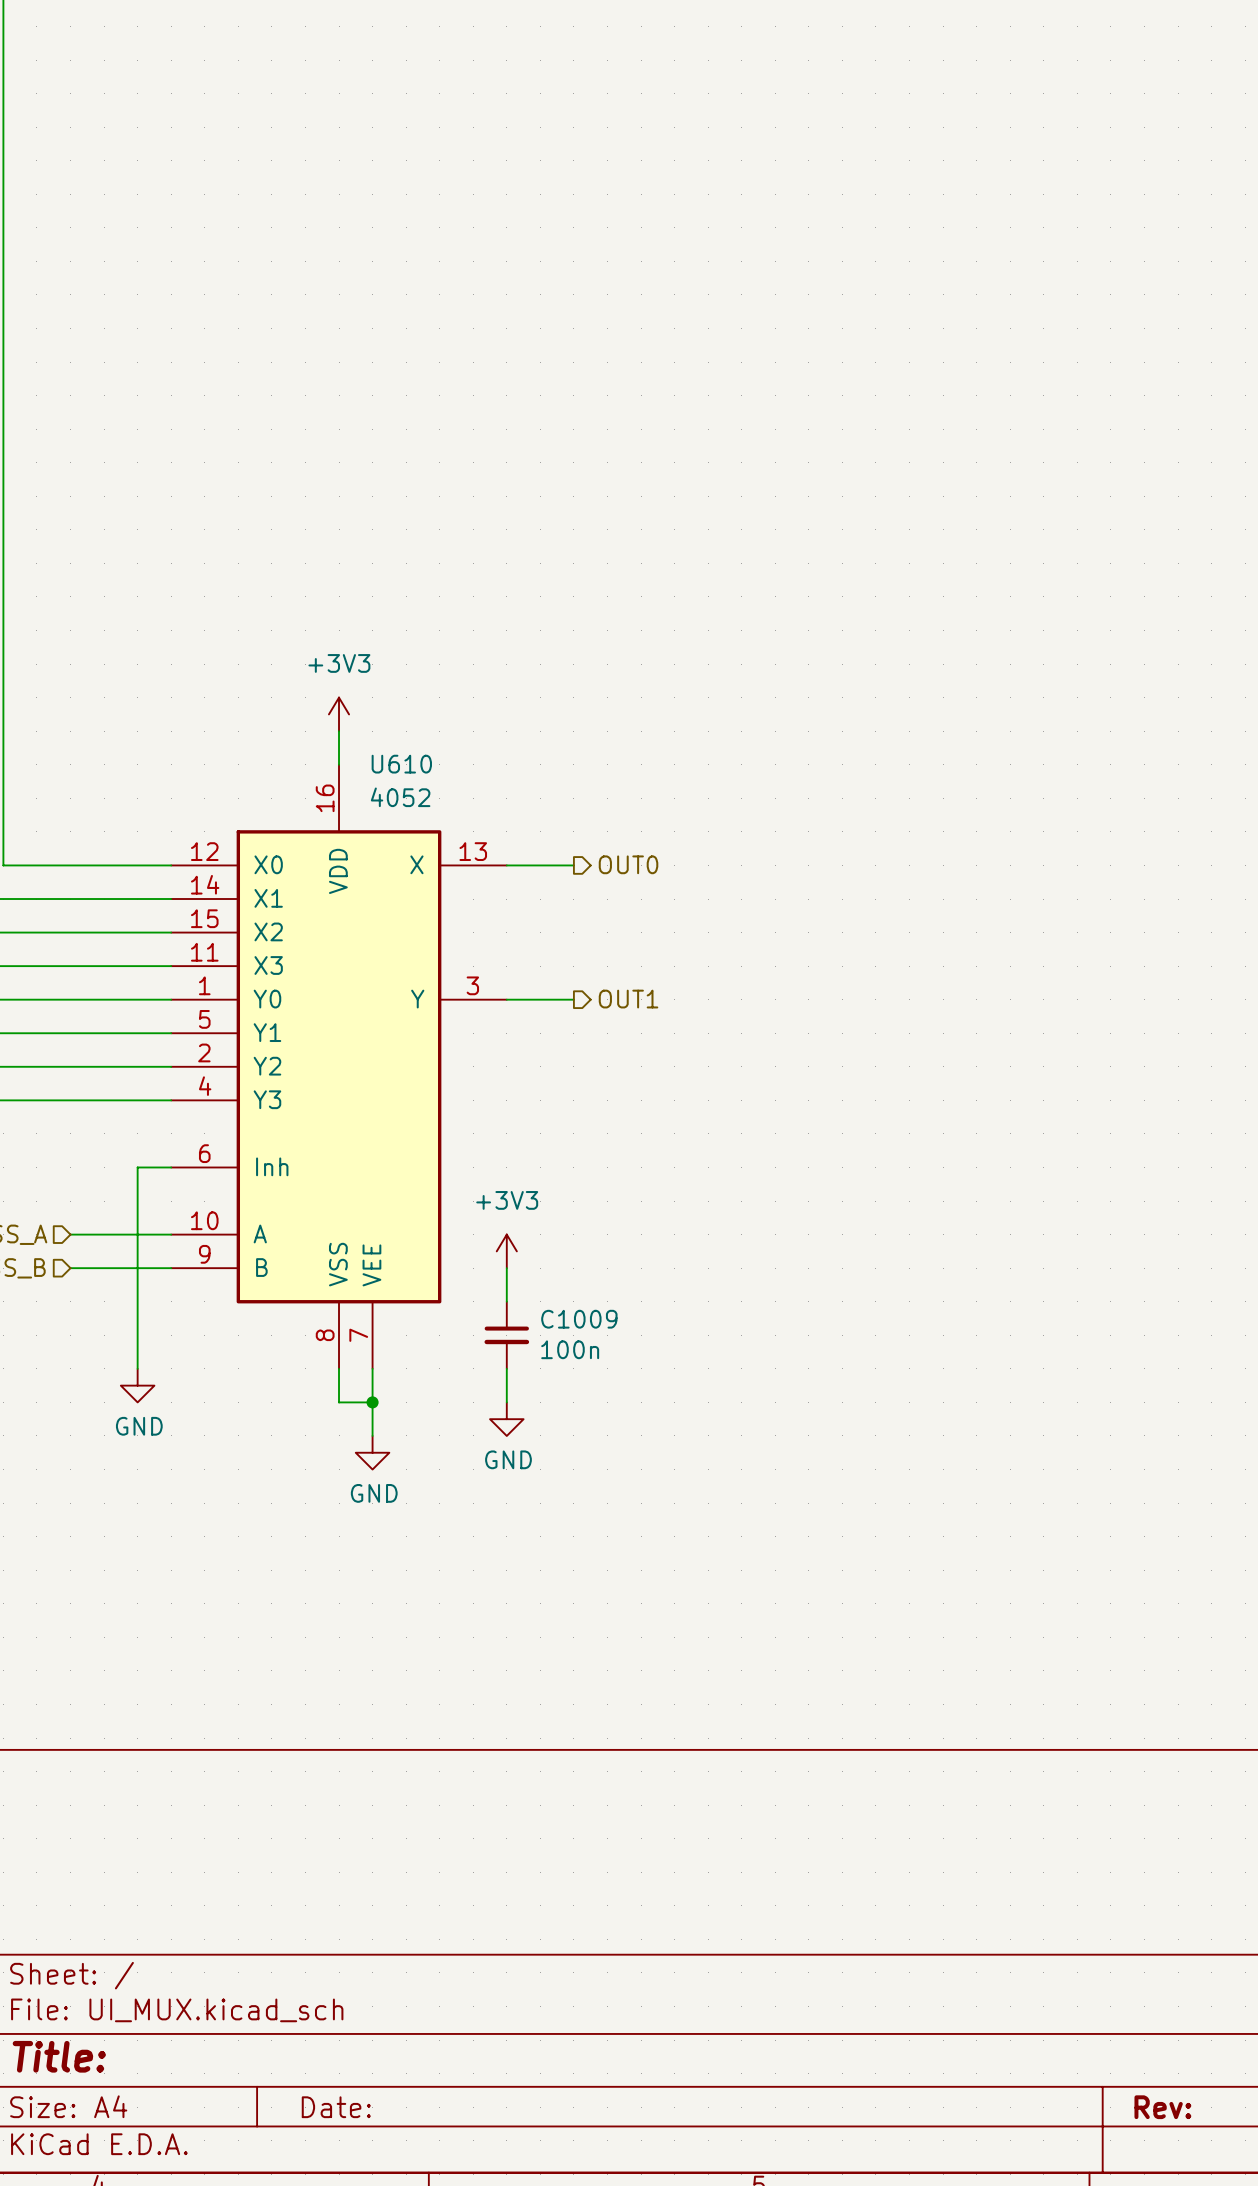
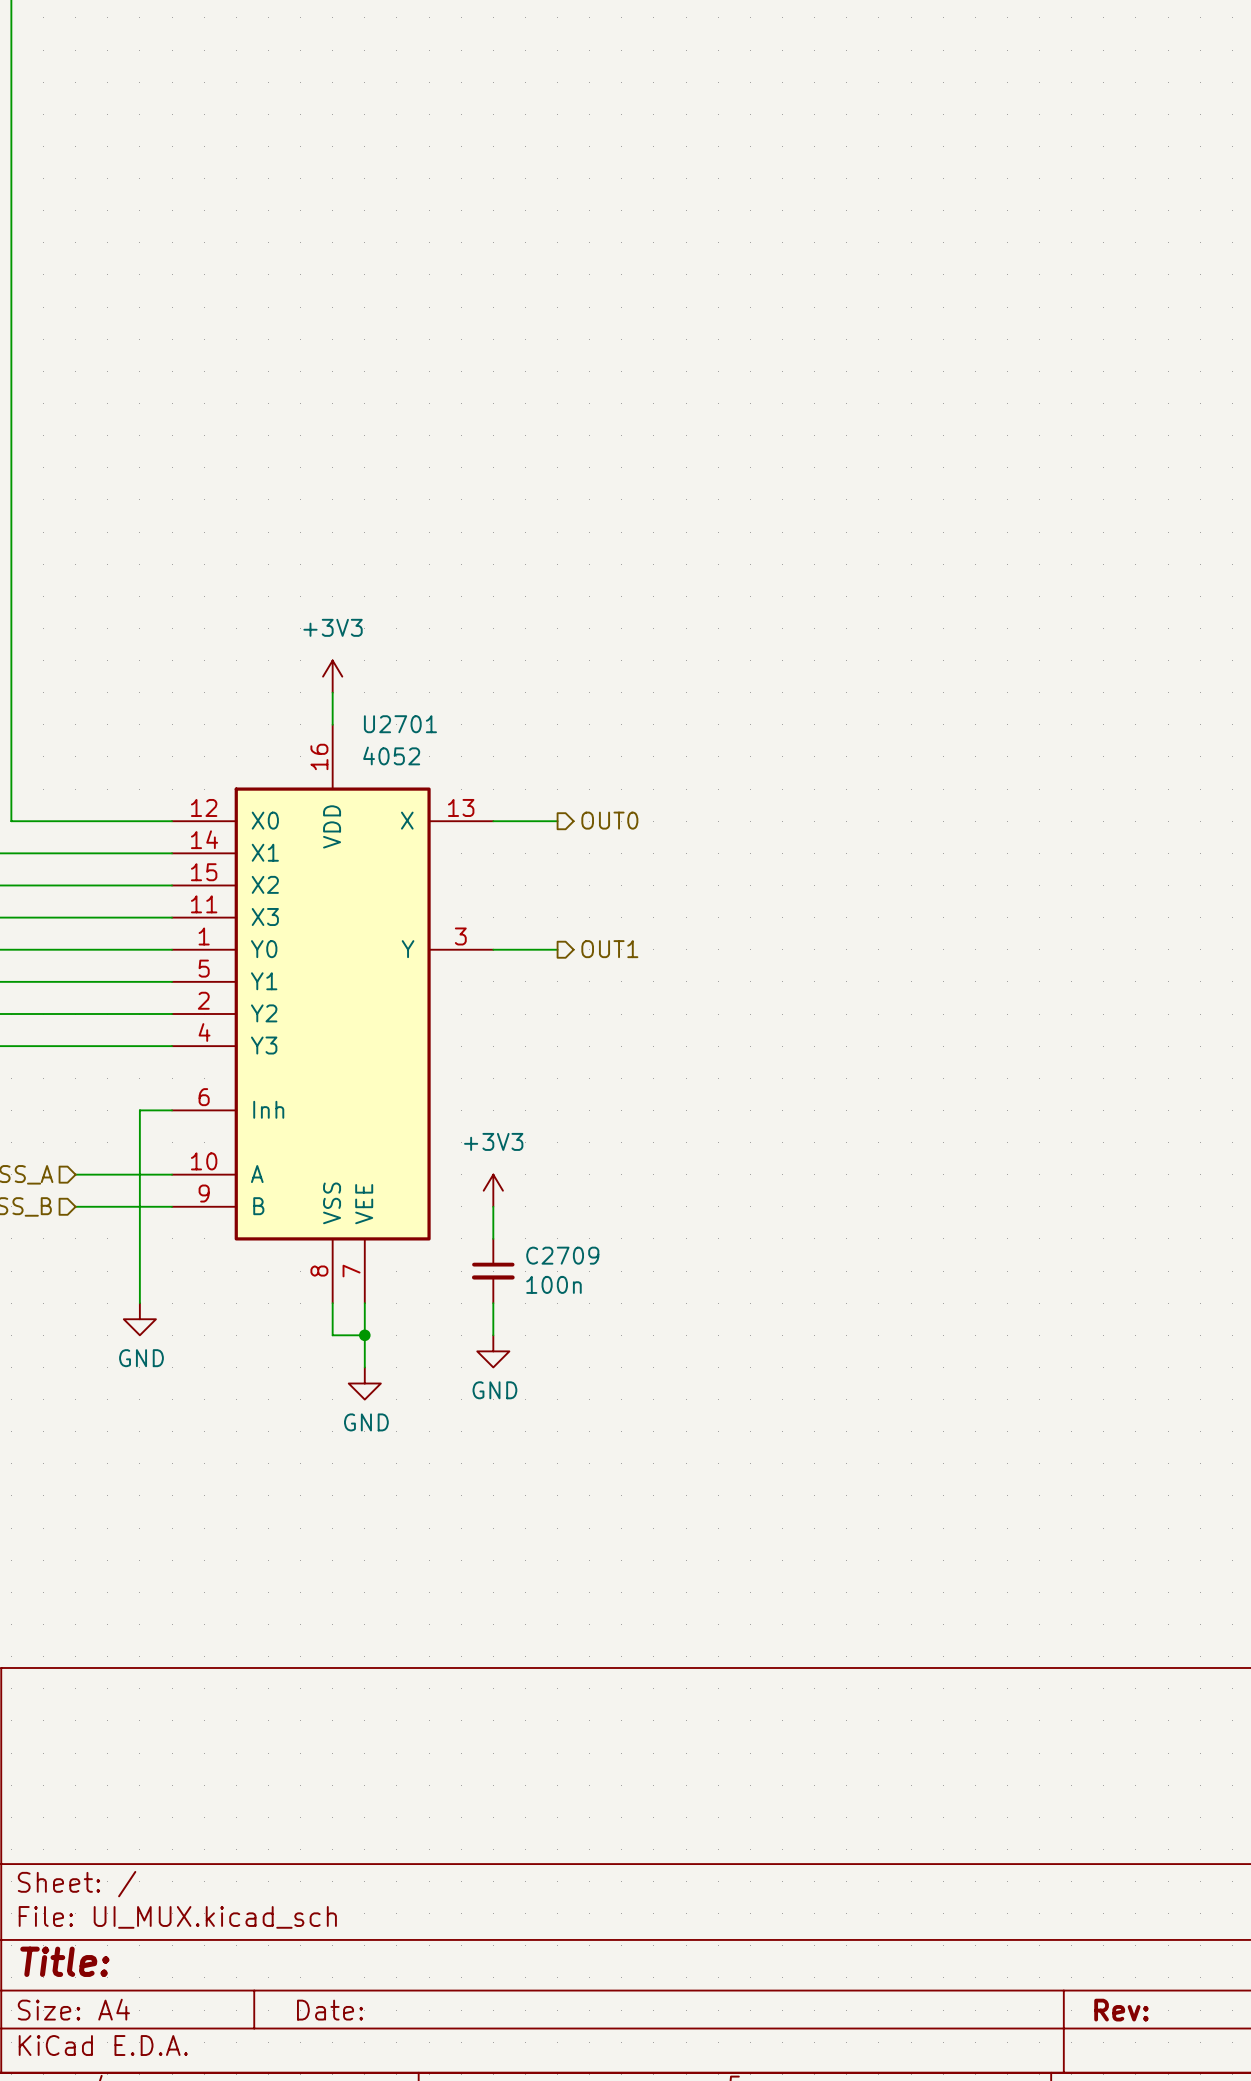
U610 name: U610 (401, 764) -> U2701 (400, 724)
C1009 name: C1009 (579, 1319) -> C2709 (562, 1255)

